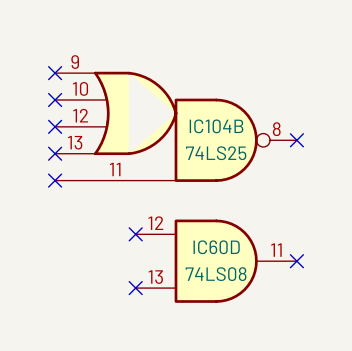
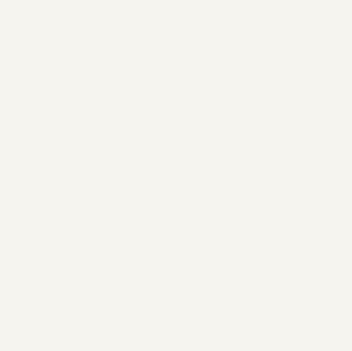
no-connect mark: (55, 73) -> none
no-connect mark: (55, 99) -> none
no-connect mark: (55, 126) -> none
IC104B: 74LS25 (176, 126) -> none
no-connect mark: (296, 140) -> none
no-connect mark: (55, 153) -> none
no-connect mark: (55, 180) -> none
no-connect mark: (135, 234) -> none
IC60D: 74LS08 (216, 261) -> none
no-connect mark: (296, 261) -> none
no-connect mark: (135, 288) -> none

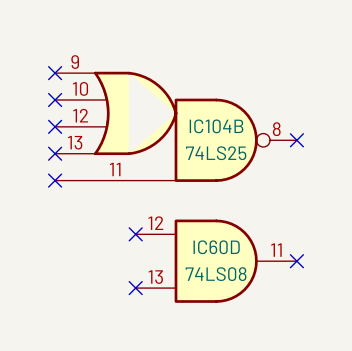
no-connect mark: none -> (55, 73)
no-connect mark: none -> (55, 99)
no-connect mark: none -> (55, 126)
IC104B: none -> 74LS25 (176, 126)
no-connect mark: none -> (296, 140)
no-connect mark: none -> (55, 153)
no-connect mark: none -> (55, 180)
no-connect mark: none -> (135, 234)
IC60D: none -> 74LS08 (216, 261)
no-connect mark: none -> (296, 261)
no-connect mark: none -> (135, 288)

